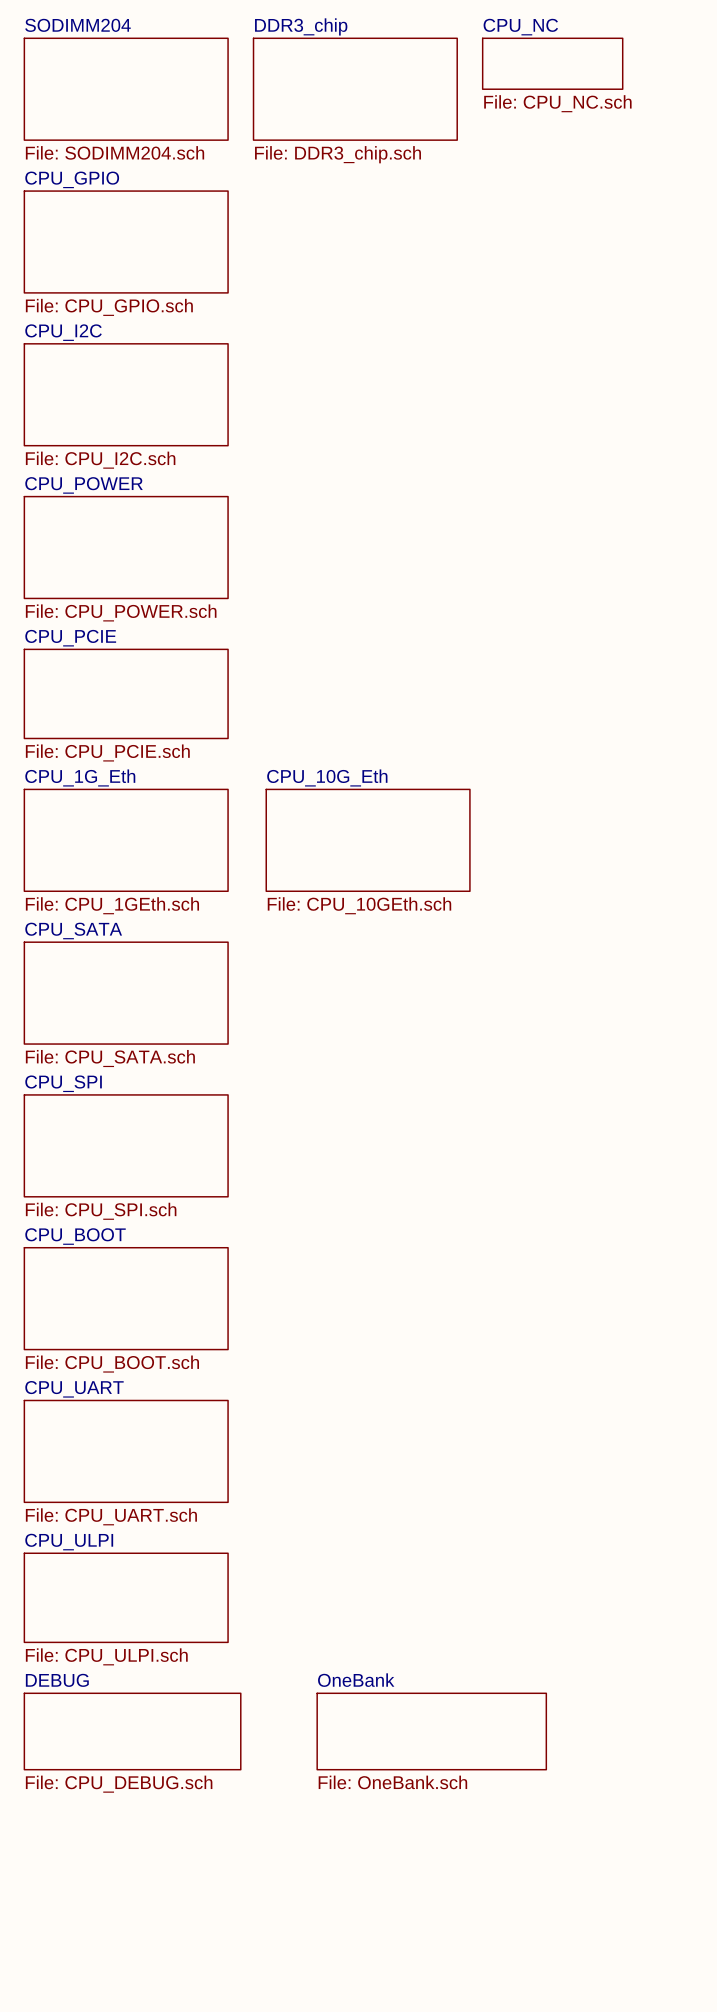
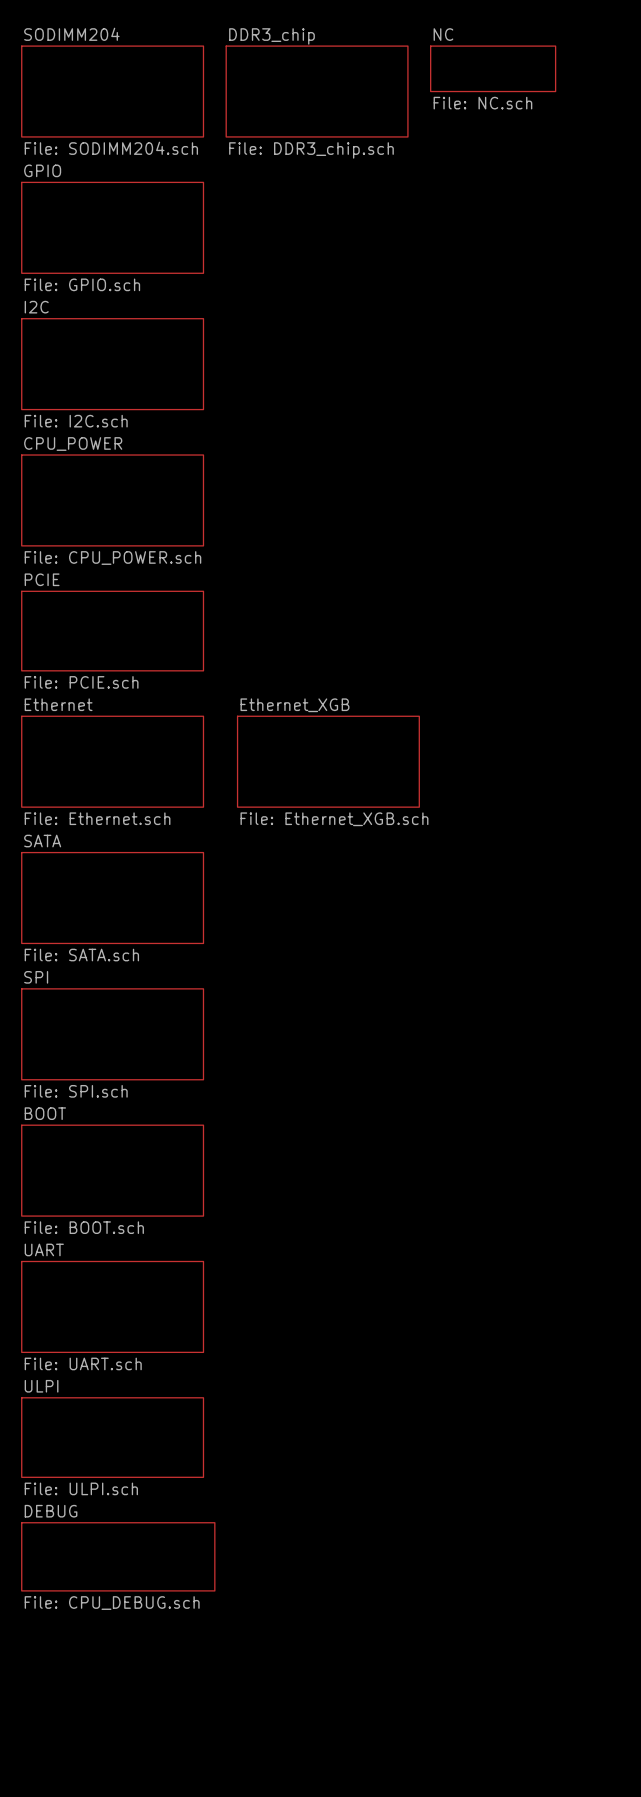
sheet CPU_NC name: CPU_NC (520, 27) -> NC (443, 34)
sheet CPU_NC value: File: CPU_NC.sch (557, 103) -> File: NC.sch (482, 103)
sheet CPU_GPIO name: CPU_GPIO (72, 179) -> GPIO (42, 170)
sheet CPU_GPIO value: File: CPU_GPIO.sch (109, 307) -> File: GPIO.sch (82, 284)
sheet CPU_I2C name: CPU_I2C (63, 332) -> I2C (36, 307)
sheet CPU_I2C value: File: CPU_I2C.sch (100, 460) -> File: I2C.sch (76, 421)
sheet CPU_PCIE name: CPU_PCIE (70, 638) -> PCIE (42, 579)
sheet CPU_PCIE value: File: CPU_PCIE.sch (107, 752) -> File: PCIE.sch (81, 682)
sheet CPU_1G_Eth name: CPU_1G_Eth (80, 777) -> Ethernet (58, 704)
sheet CPU_10G_Eth name: CPU_10G_Eth (327, 777) -> Ethernet_XGB (294, 705)
sheet CPU_1G_Eth value: File: CPU_1GEth.sch (112, 905) -> File: Ethernet.sch (97, 818)
sheet CPU_10G_Eth value: File: CPU_10GEth.sch (359, 905) -> File: Ethernet_XGB.sch (334, 819)
sheet CPU_SATA name: CPU_SATA (73, 930) -> SATA (42, 841)
sheet CPU_SATA value: File: CPU_SATA.sch (110, 1058) -> File: SATA.sch (81, 955)
sheet CPU_SPI name: CPU_SPI (63, 1083) -> SPI (36, 977)
sheet CPU_SPI value: File: CPU_SPI.sch (101, 1211) -> File: SPI.sch (76, 1091)
sheet CPU_BOOT name: CPU_BOOT (75, 1236) -> BOOT (45, 1113)
sheet CPU_BOOT value: File: CPU_BOOT.sch (112, 1364) -> File: BOOT.sch (84, 1227)
sheet CPU_UART name: CPU_UART (74, 1389) -> UART (44, 1249)
sheet CPU_UART value: File: CPU_UART.sch (111, 1516) -> File: UART.sch (83, 1363)
sheet CPU_ULPI name: CPU_ULPI (69, 1542) -> ULPI (41, 1386)
sheet CPU_ULPI value: File: CPU_ULPI.sch (106, 1656) -> File: ULPI.sch (81, 1488)
sheet OneBank: File: OneBank.sch (431, 1731) -> none

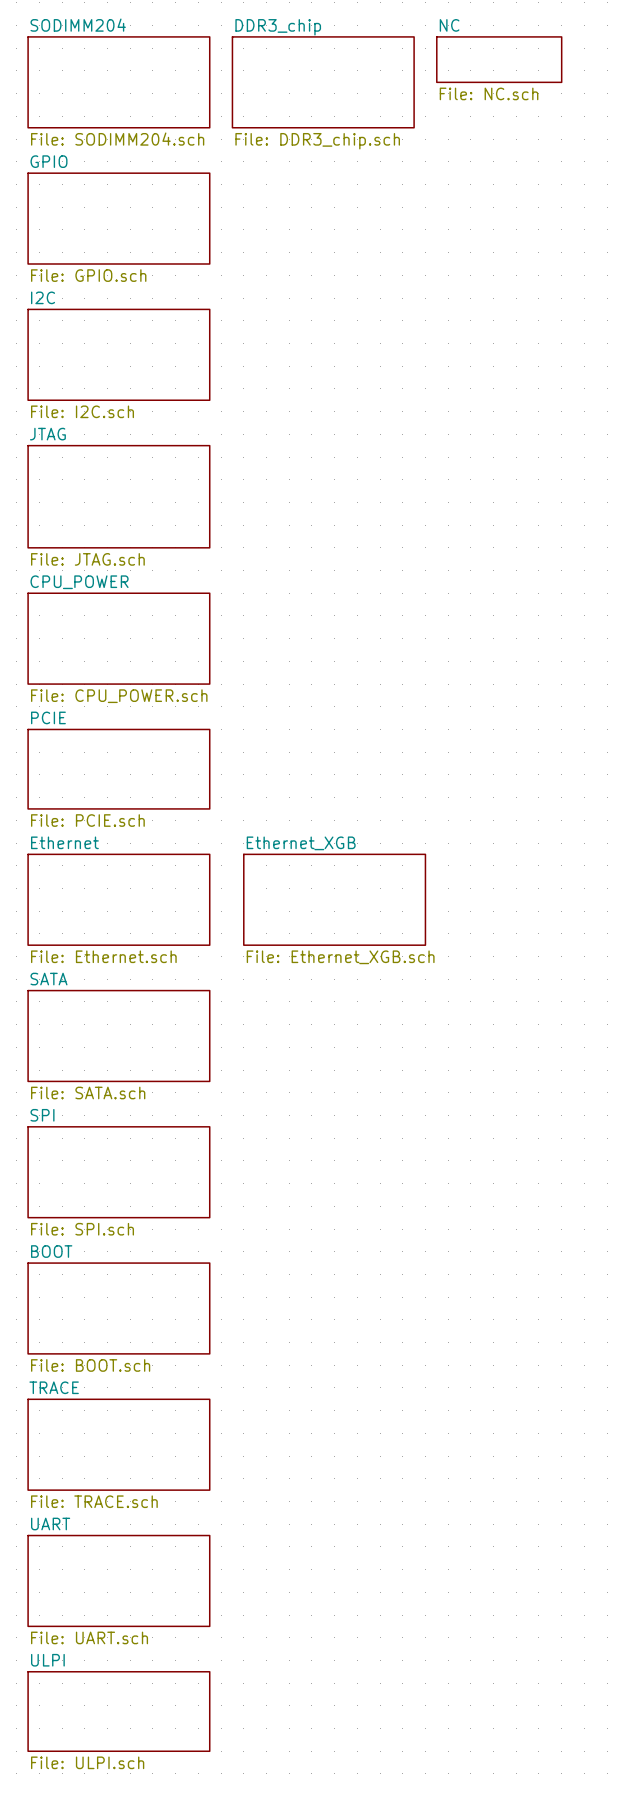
sheet CPU_POWER position: (112, 500) -> (118, 638)
sheet JTAG: none -> File: JTAG.sch (118, 496)
sheet PCIE position: (112, 631) -> (118, 769)
sheet Ethernet position: (112, 761) -> (118, 899)
sheet Ethernet_XGB position: (328, 761) -> (334, 899)
sheet SATA position: (112, 898) -> (118, 1036)
sheet SPI position: (112, 1034) -> (118, 1172)
sheet BOOT position: (112, 1170) -> (118, 1308)
sheet UART: File: UART.sch (112, 1306) -> none
sheet ULPI: File: ULPI.sch (112, 1437) -> none
sheet TRACE: none -> File: TRACE.sch (118, 1444)
sheet DEBUG: File: CPU_DEBUG.sch (118, 1556) -> none
sheet UART: none -> File: UART.sch (118, 1580)
sheet ULPI: none -> File: ULPI.sch (118, 1711)

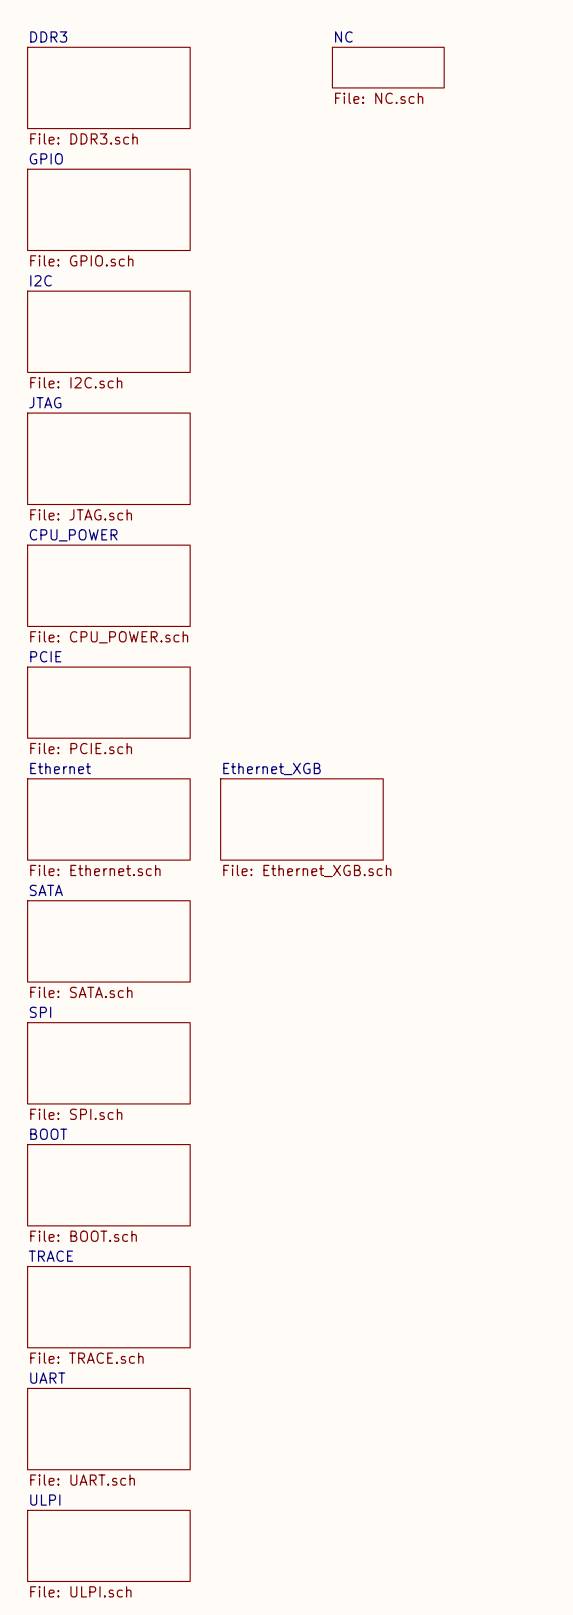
sheet SODIMM204 name: SODIMM204 (78, 25) -> DDR3 (48, 36)
sheet NC position: (499, 59) -> (388, 67)
sheet DDR3_chip: File: DDR3_chip.sch (323, 82) -> none
sheet SODIMM204 value: File: SODIMM204.sch (117, 139) -> File: DDR3.sch (84, 138)

